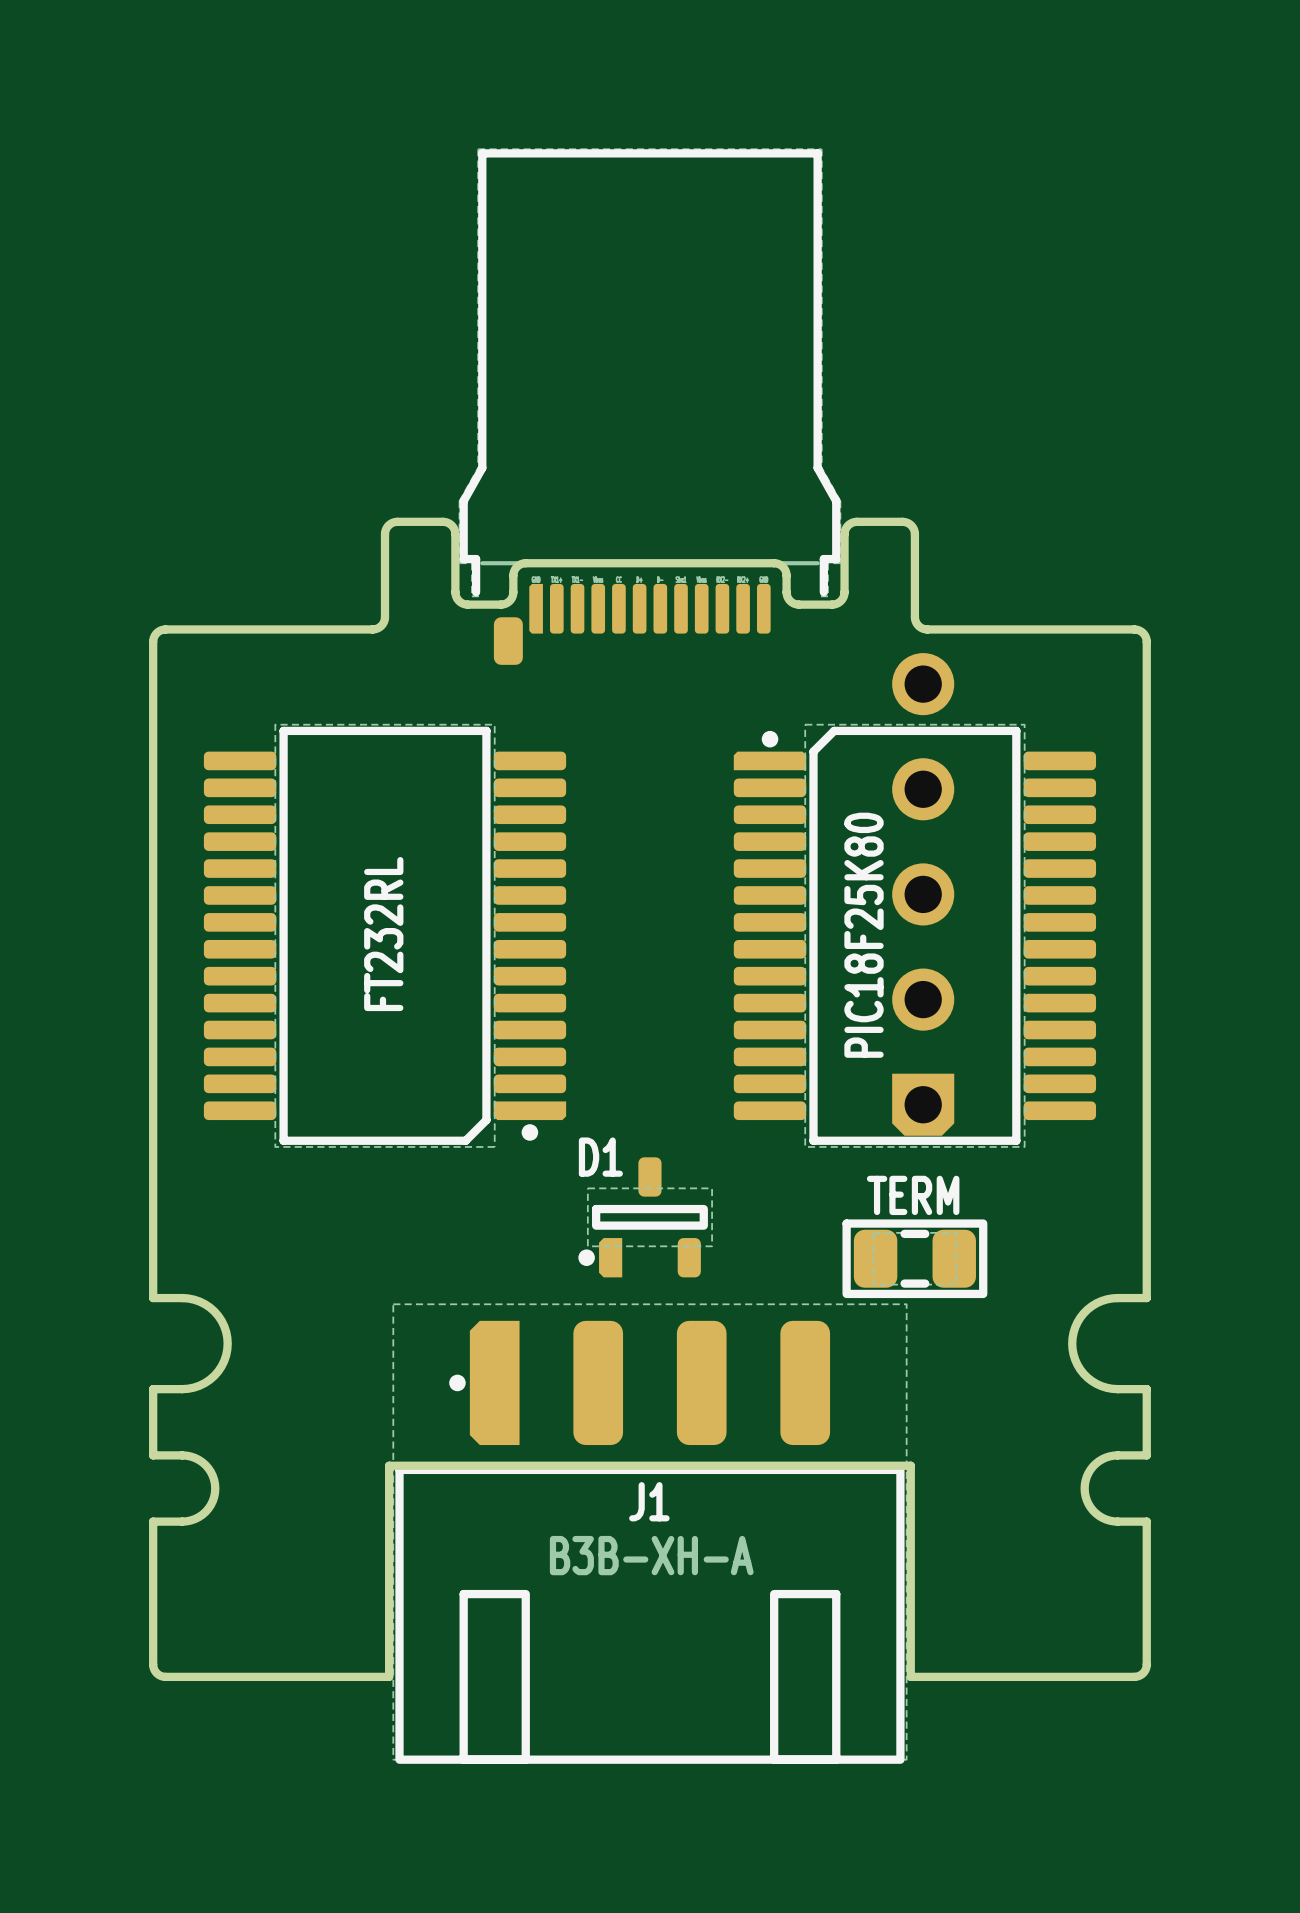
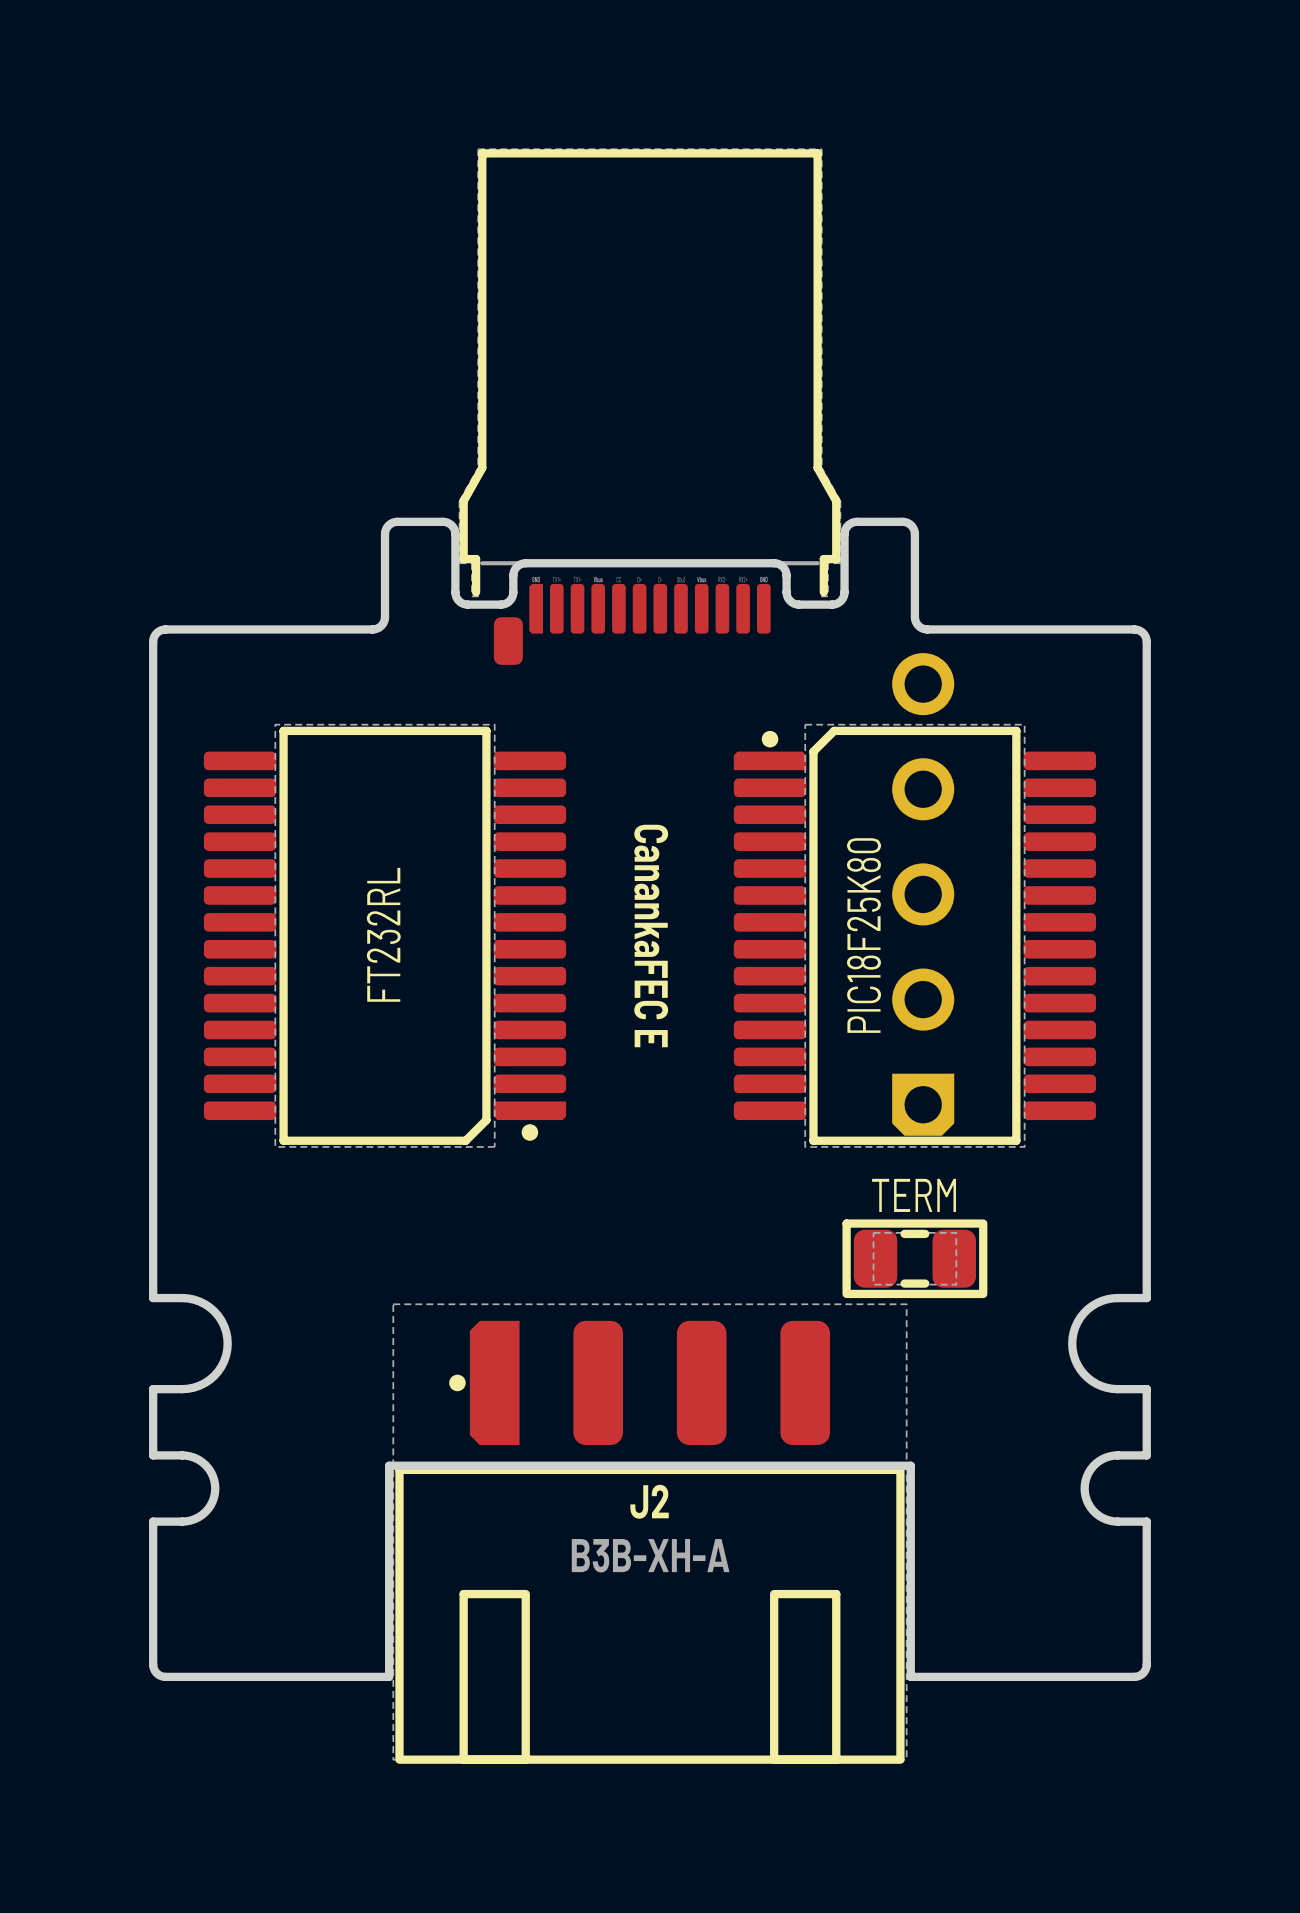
text: none -> CanankaFEC E (651, 936)
D1: (645, 1217) -> none
J1 name: J1 (649, 1501) -> J2 (649, 1501)

